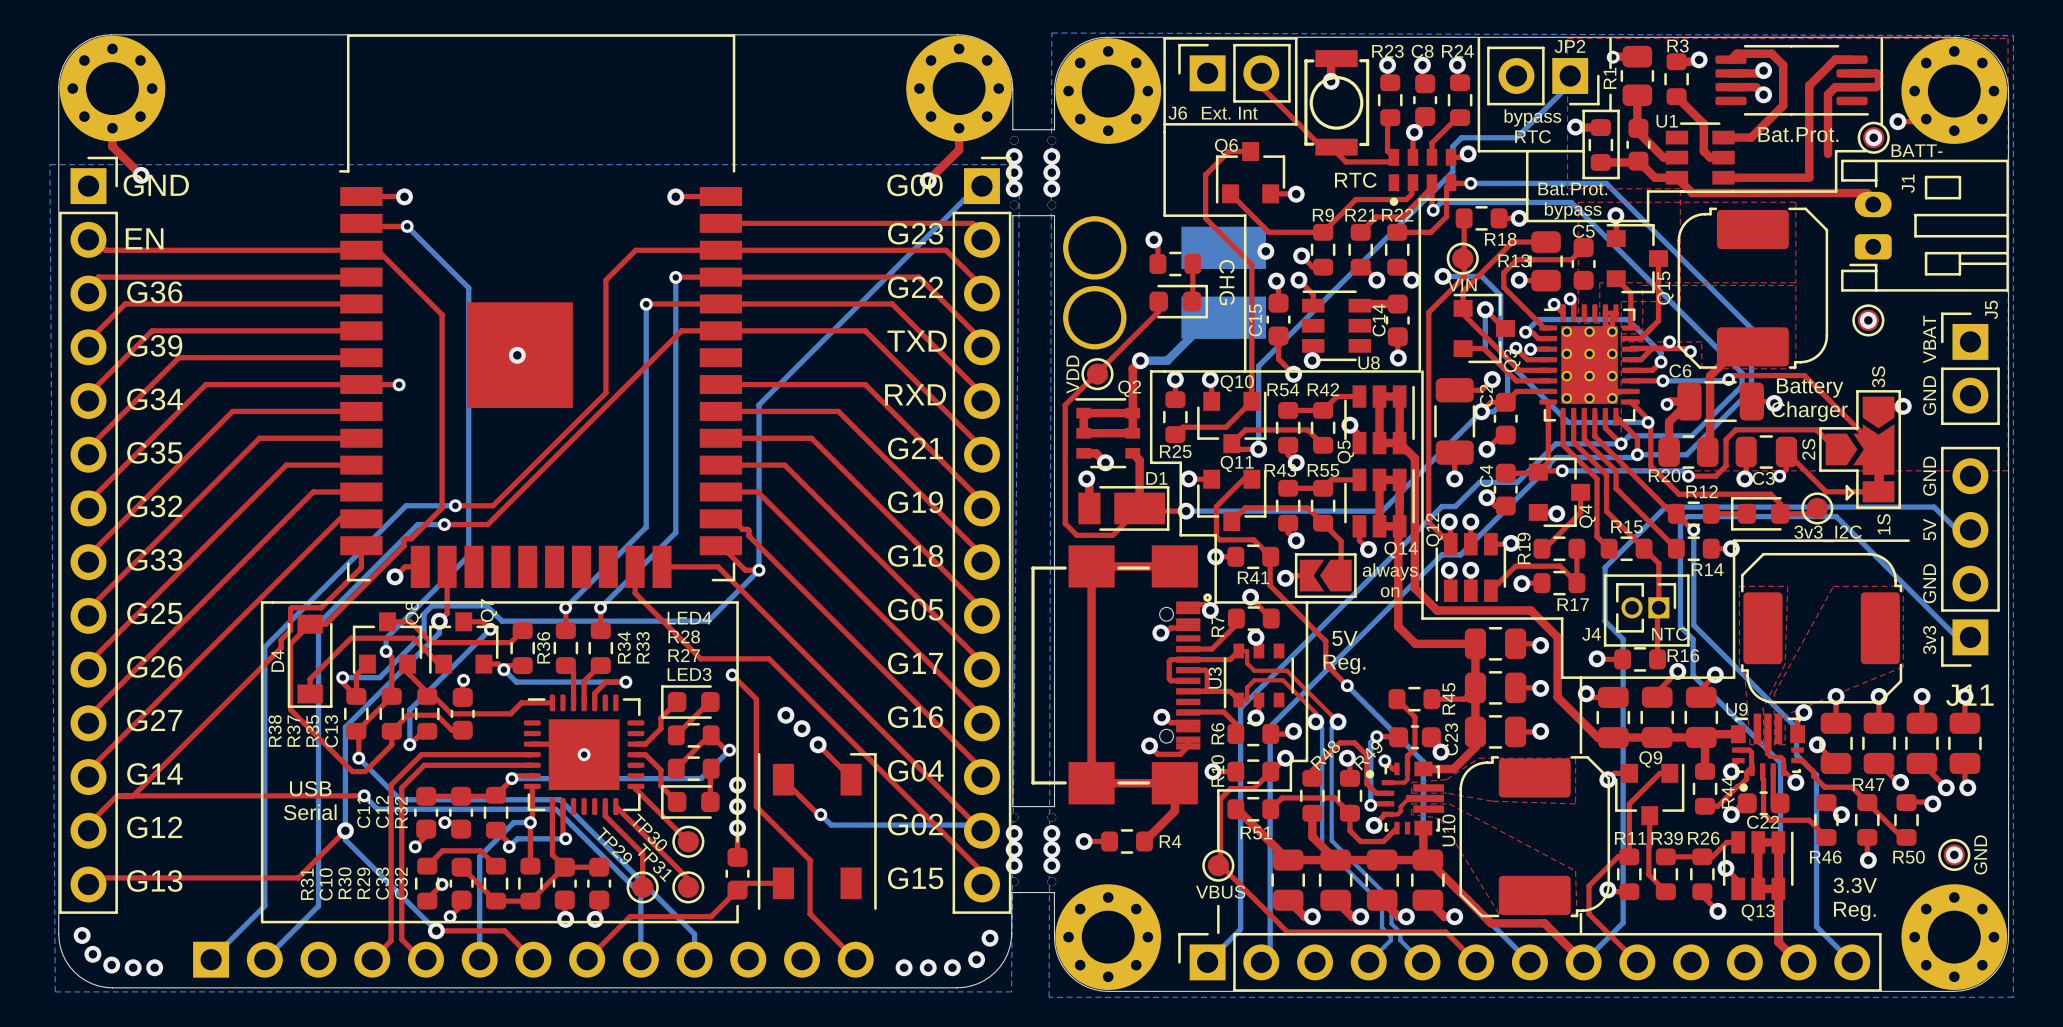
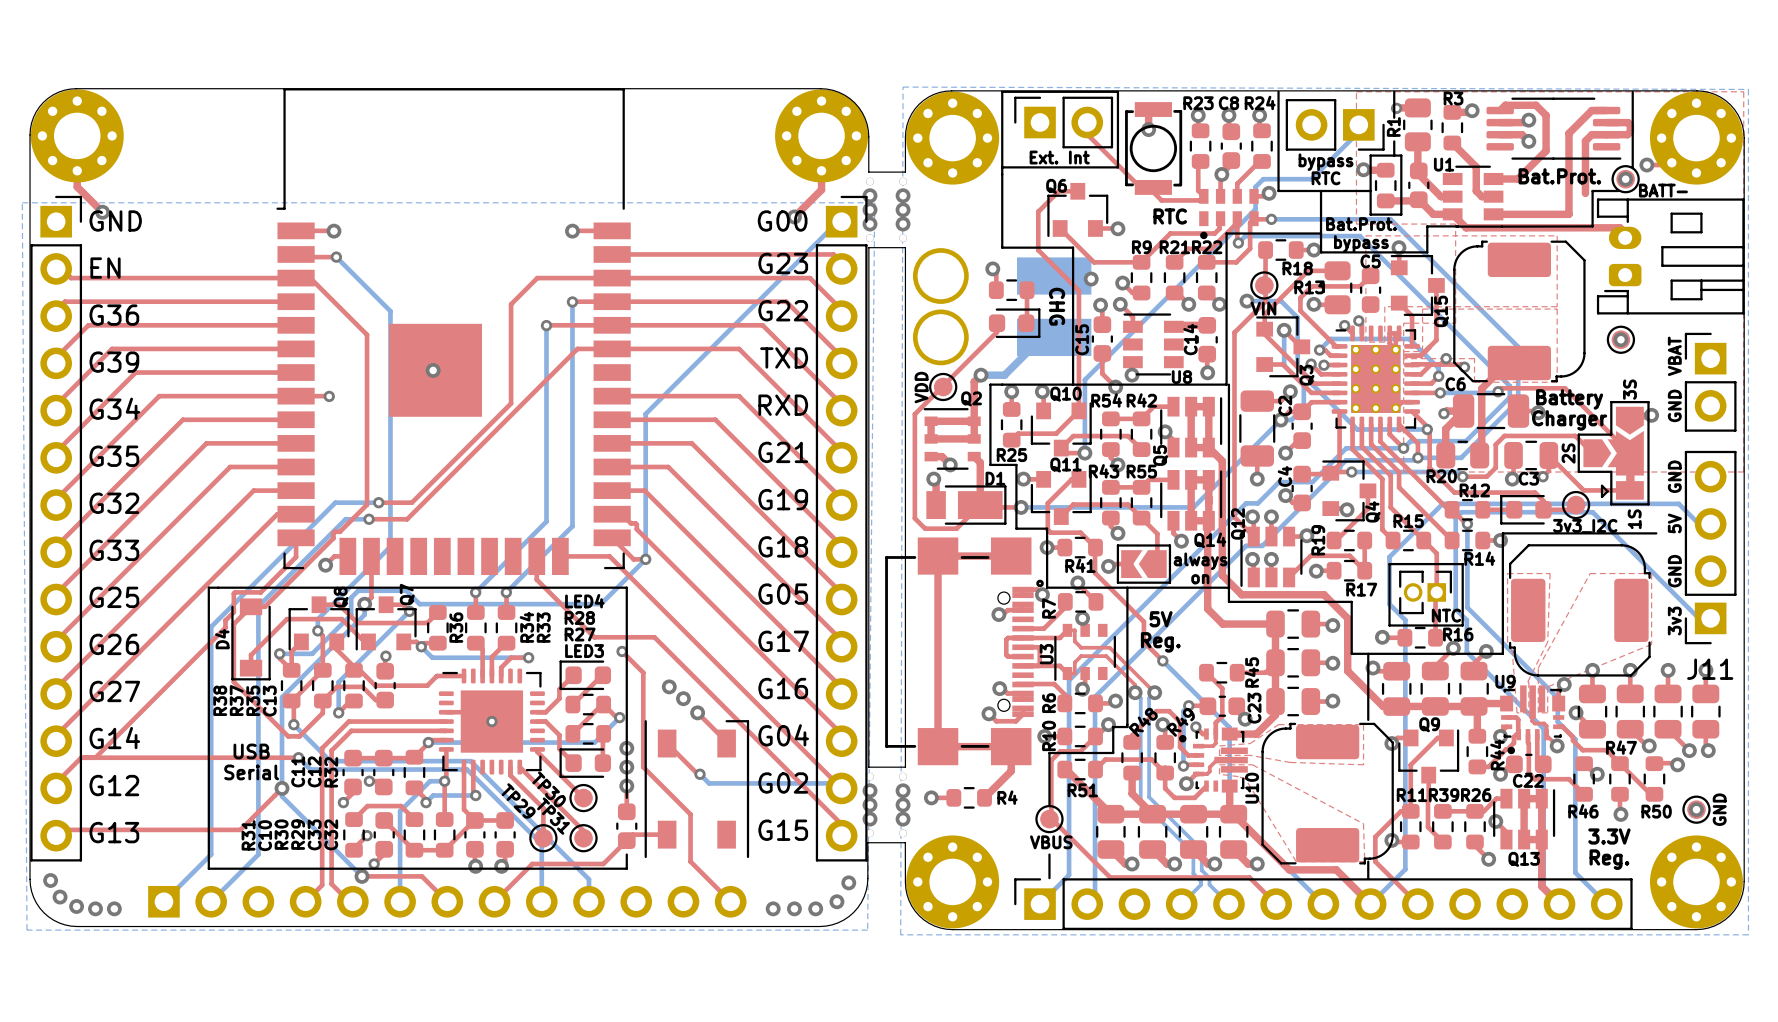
JP2 name: JP2 (1569, 46) -> none
J6 name: J6 (1177, 113) -> none
J1 name: J1 (1908, 183) -> none
J5 name: J5 (1991, 309) -> none
J4 name: J4 (1591, 634) -> none

